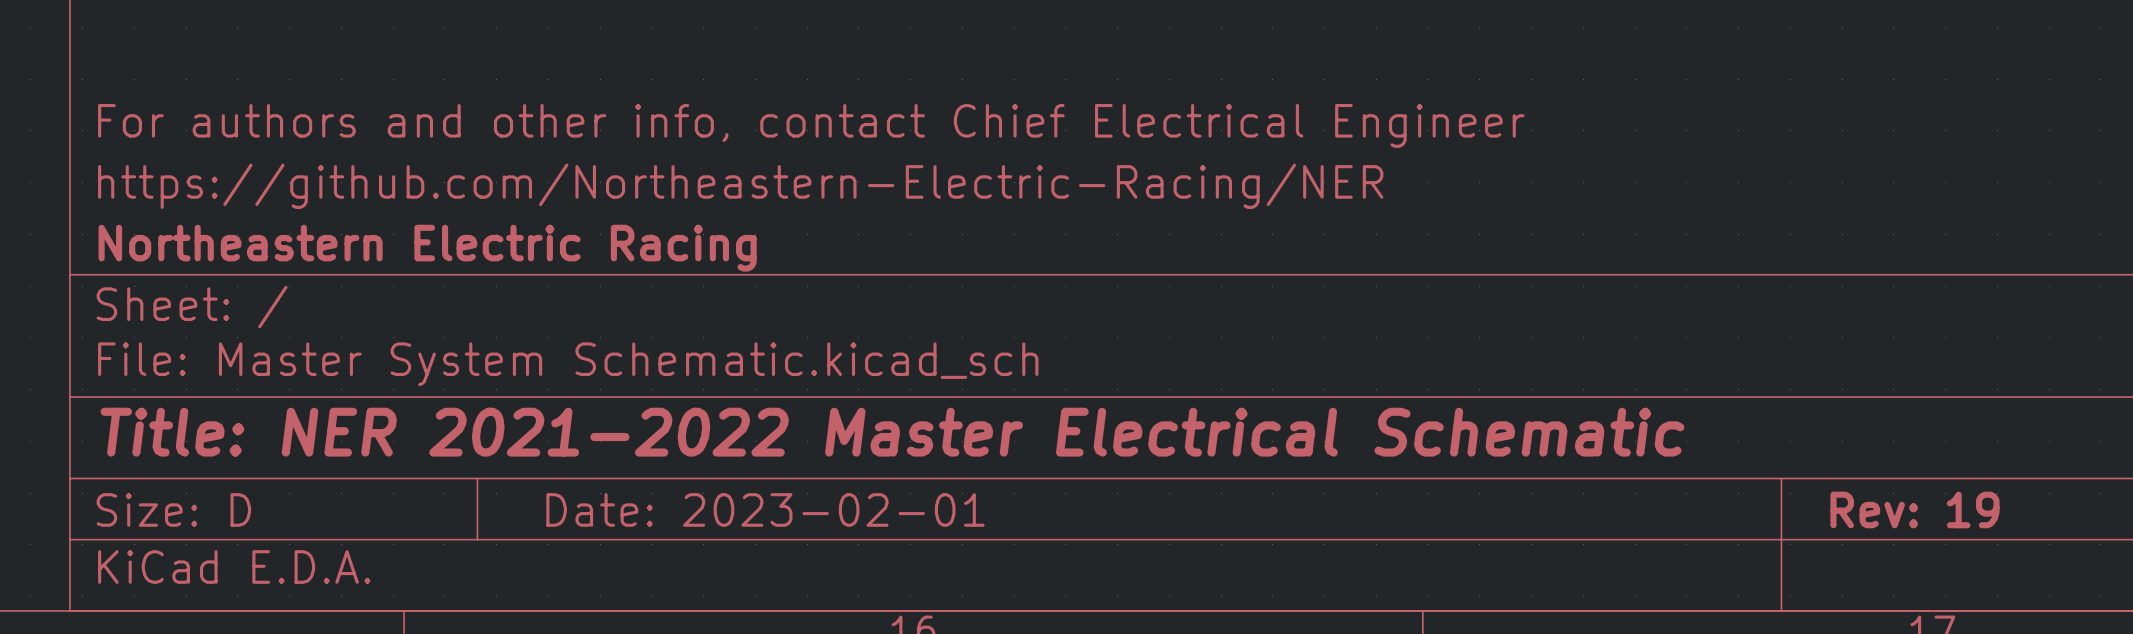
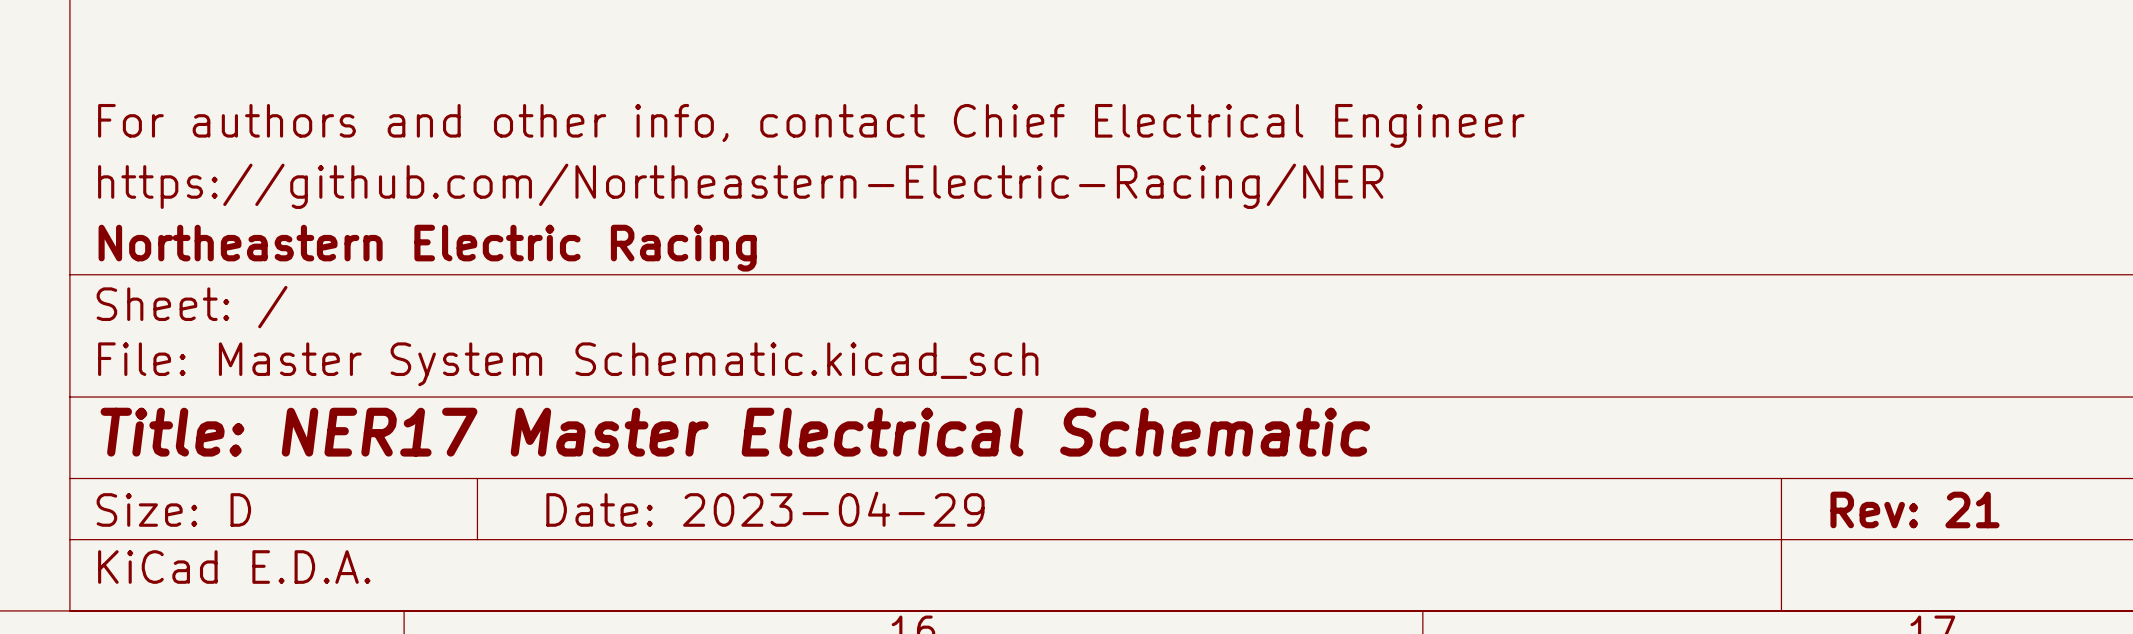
title block: Title: NER 2021-2022 Master Electrical Schematic (892, 432) -> Title: NER17 Master Electrical Schematic (735, 432)
title block: Date: 2023-02-01 (765, 509) -> Date: 2023-04-29 (765, 509)
title block: Rev: 19 (1915, 509) -> Rev: 21 (1915, 509)

